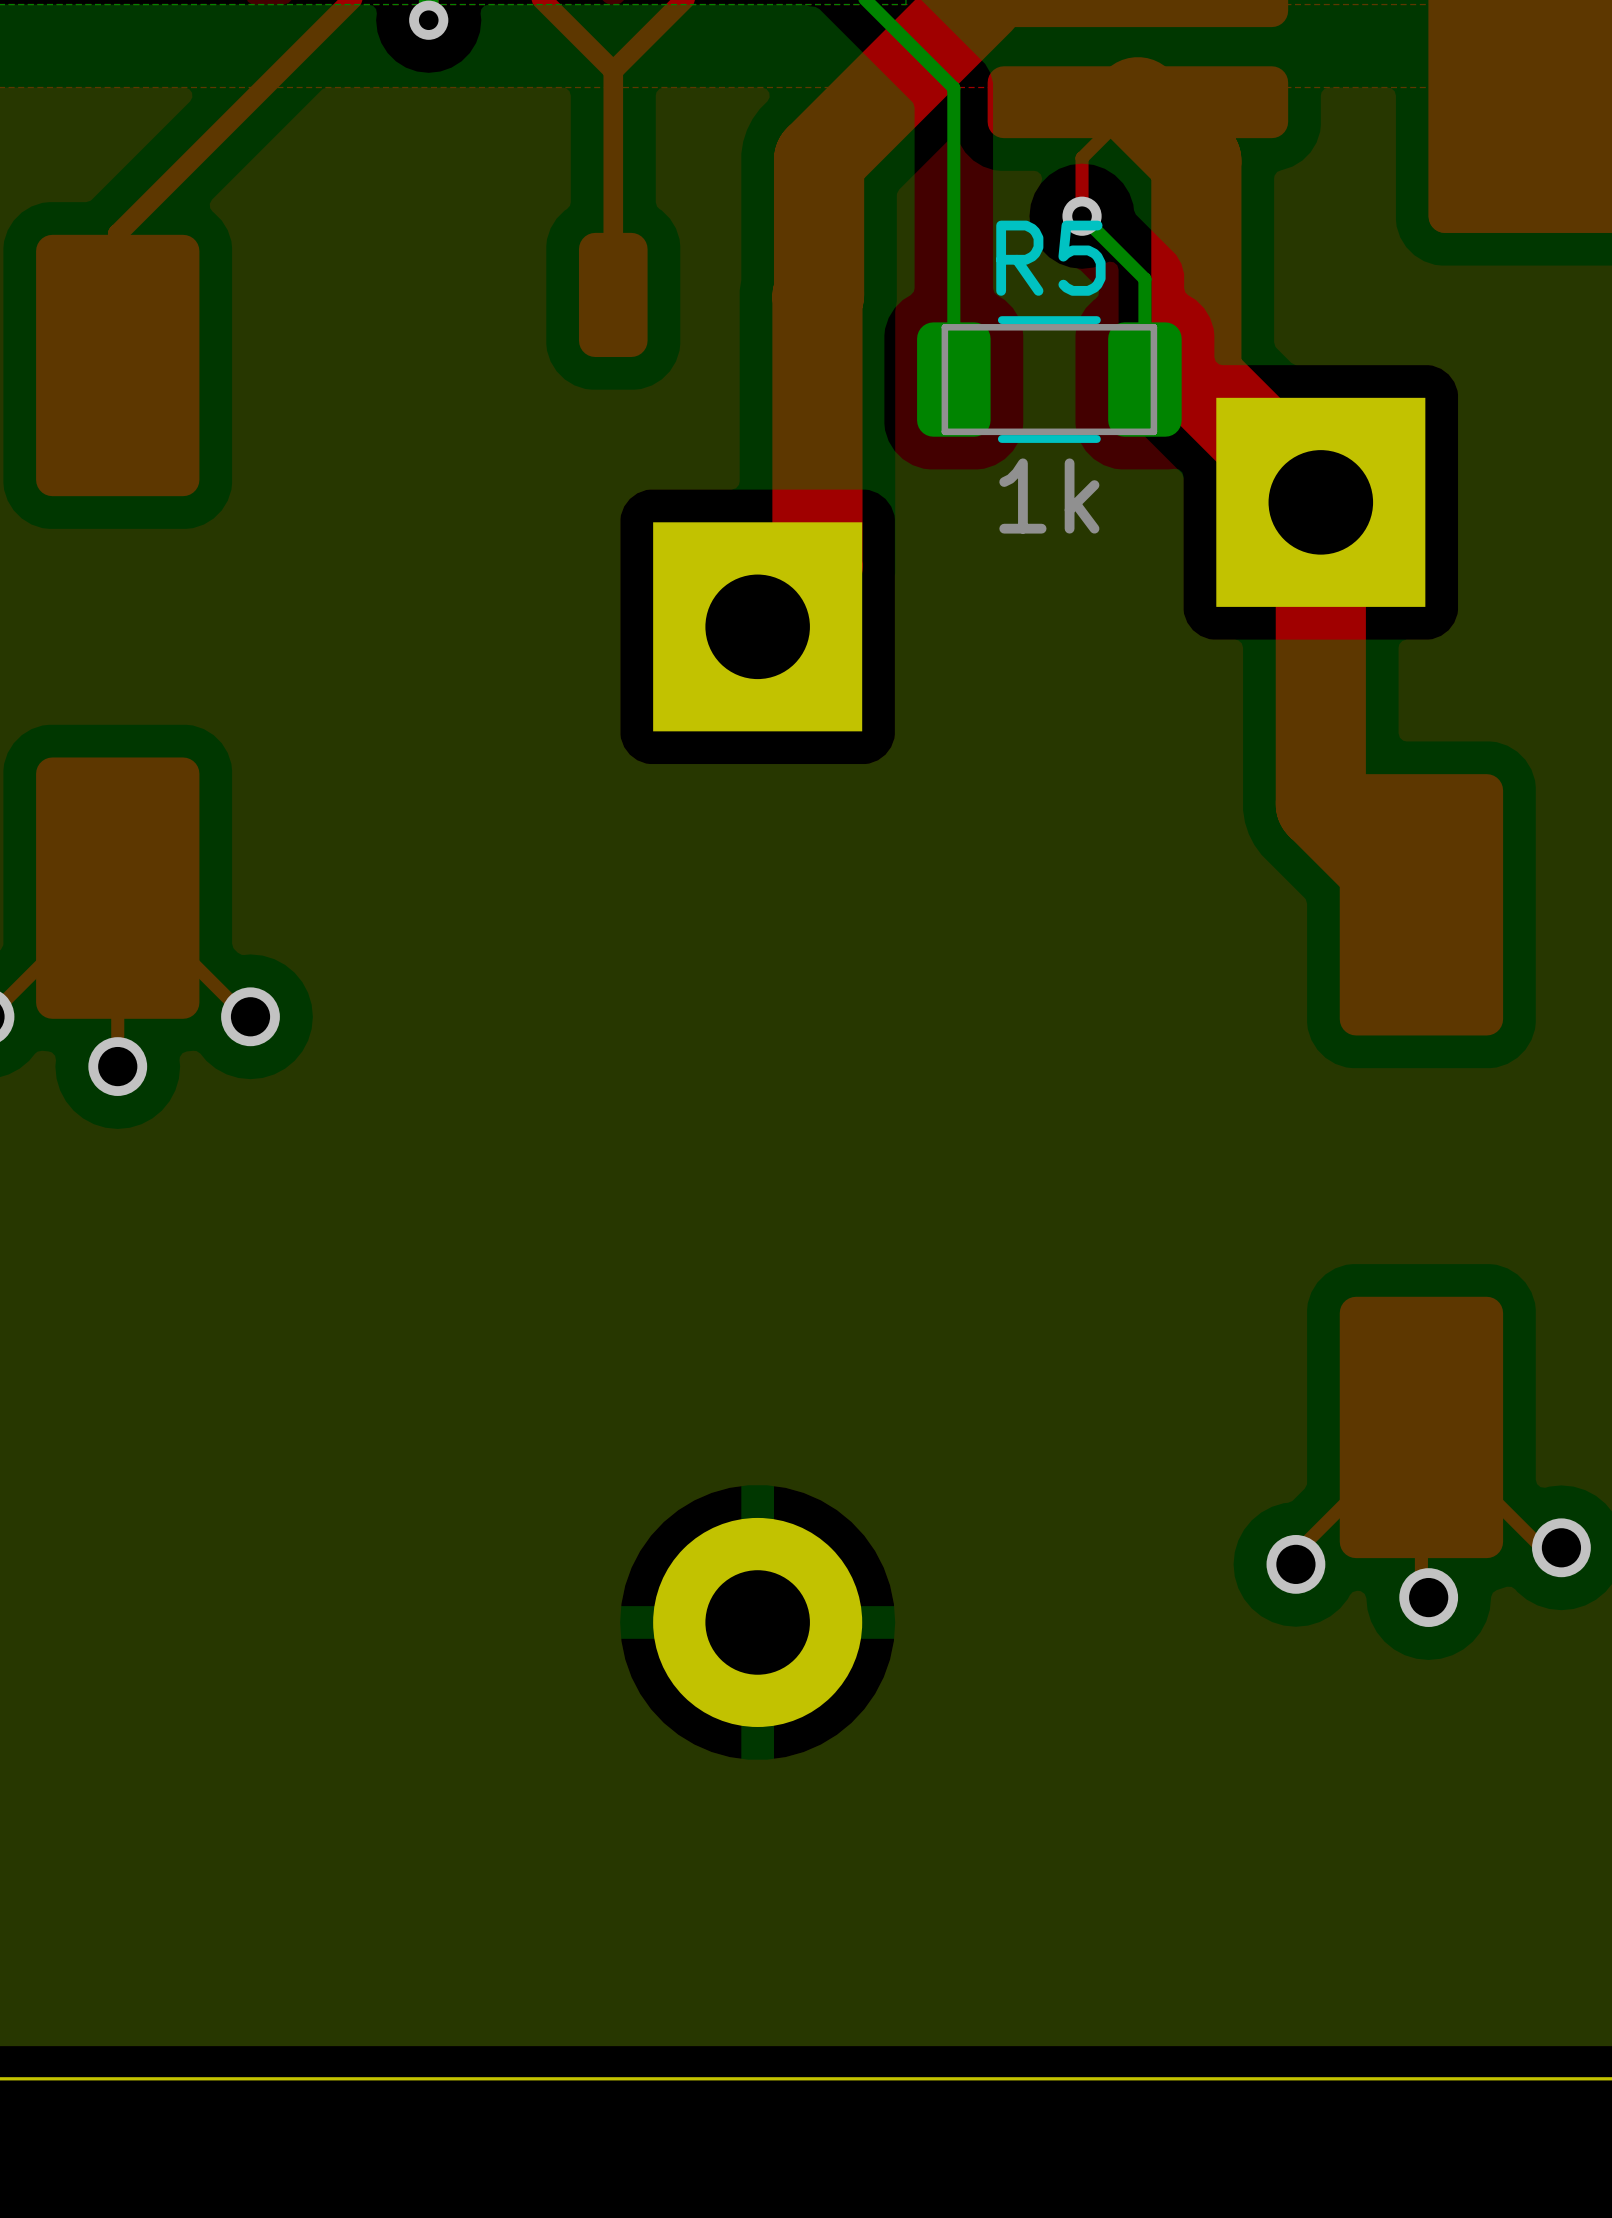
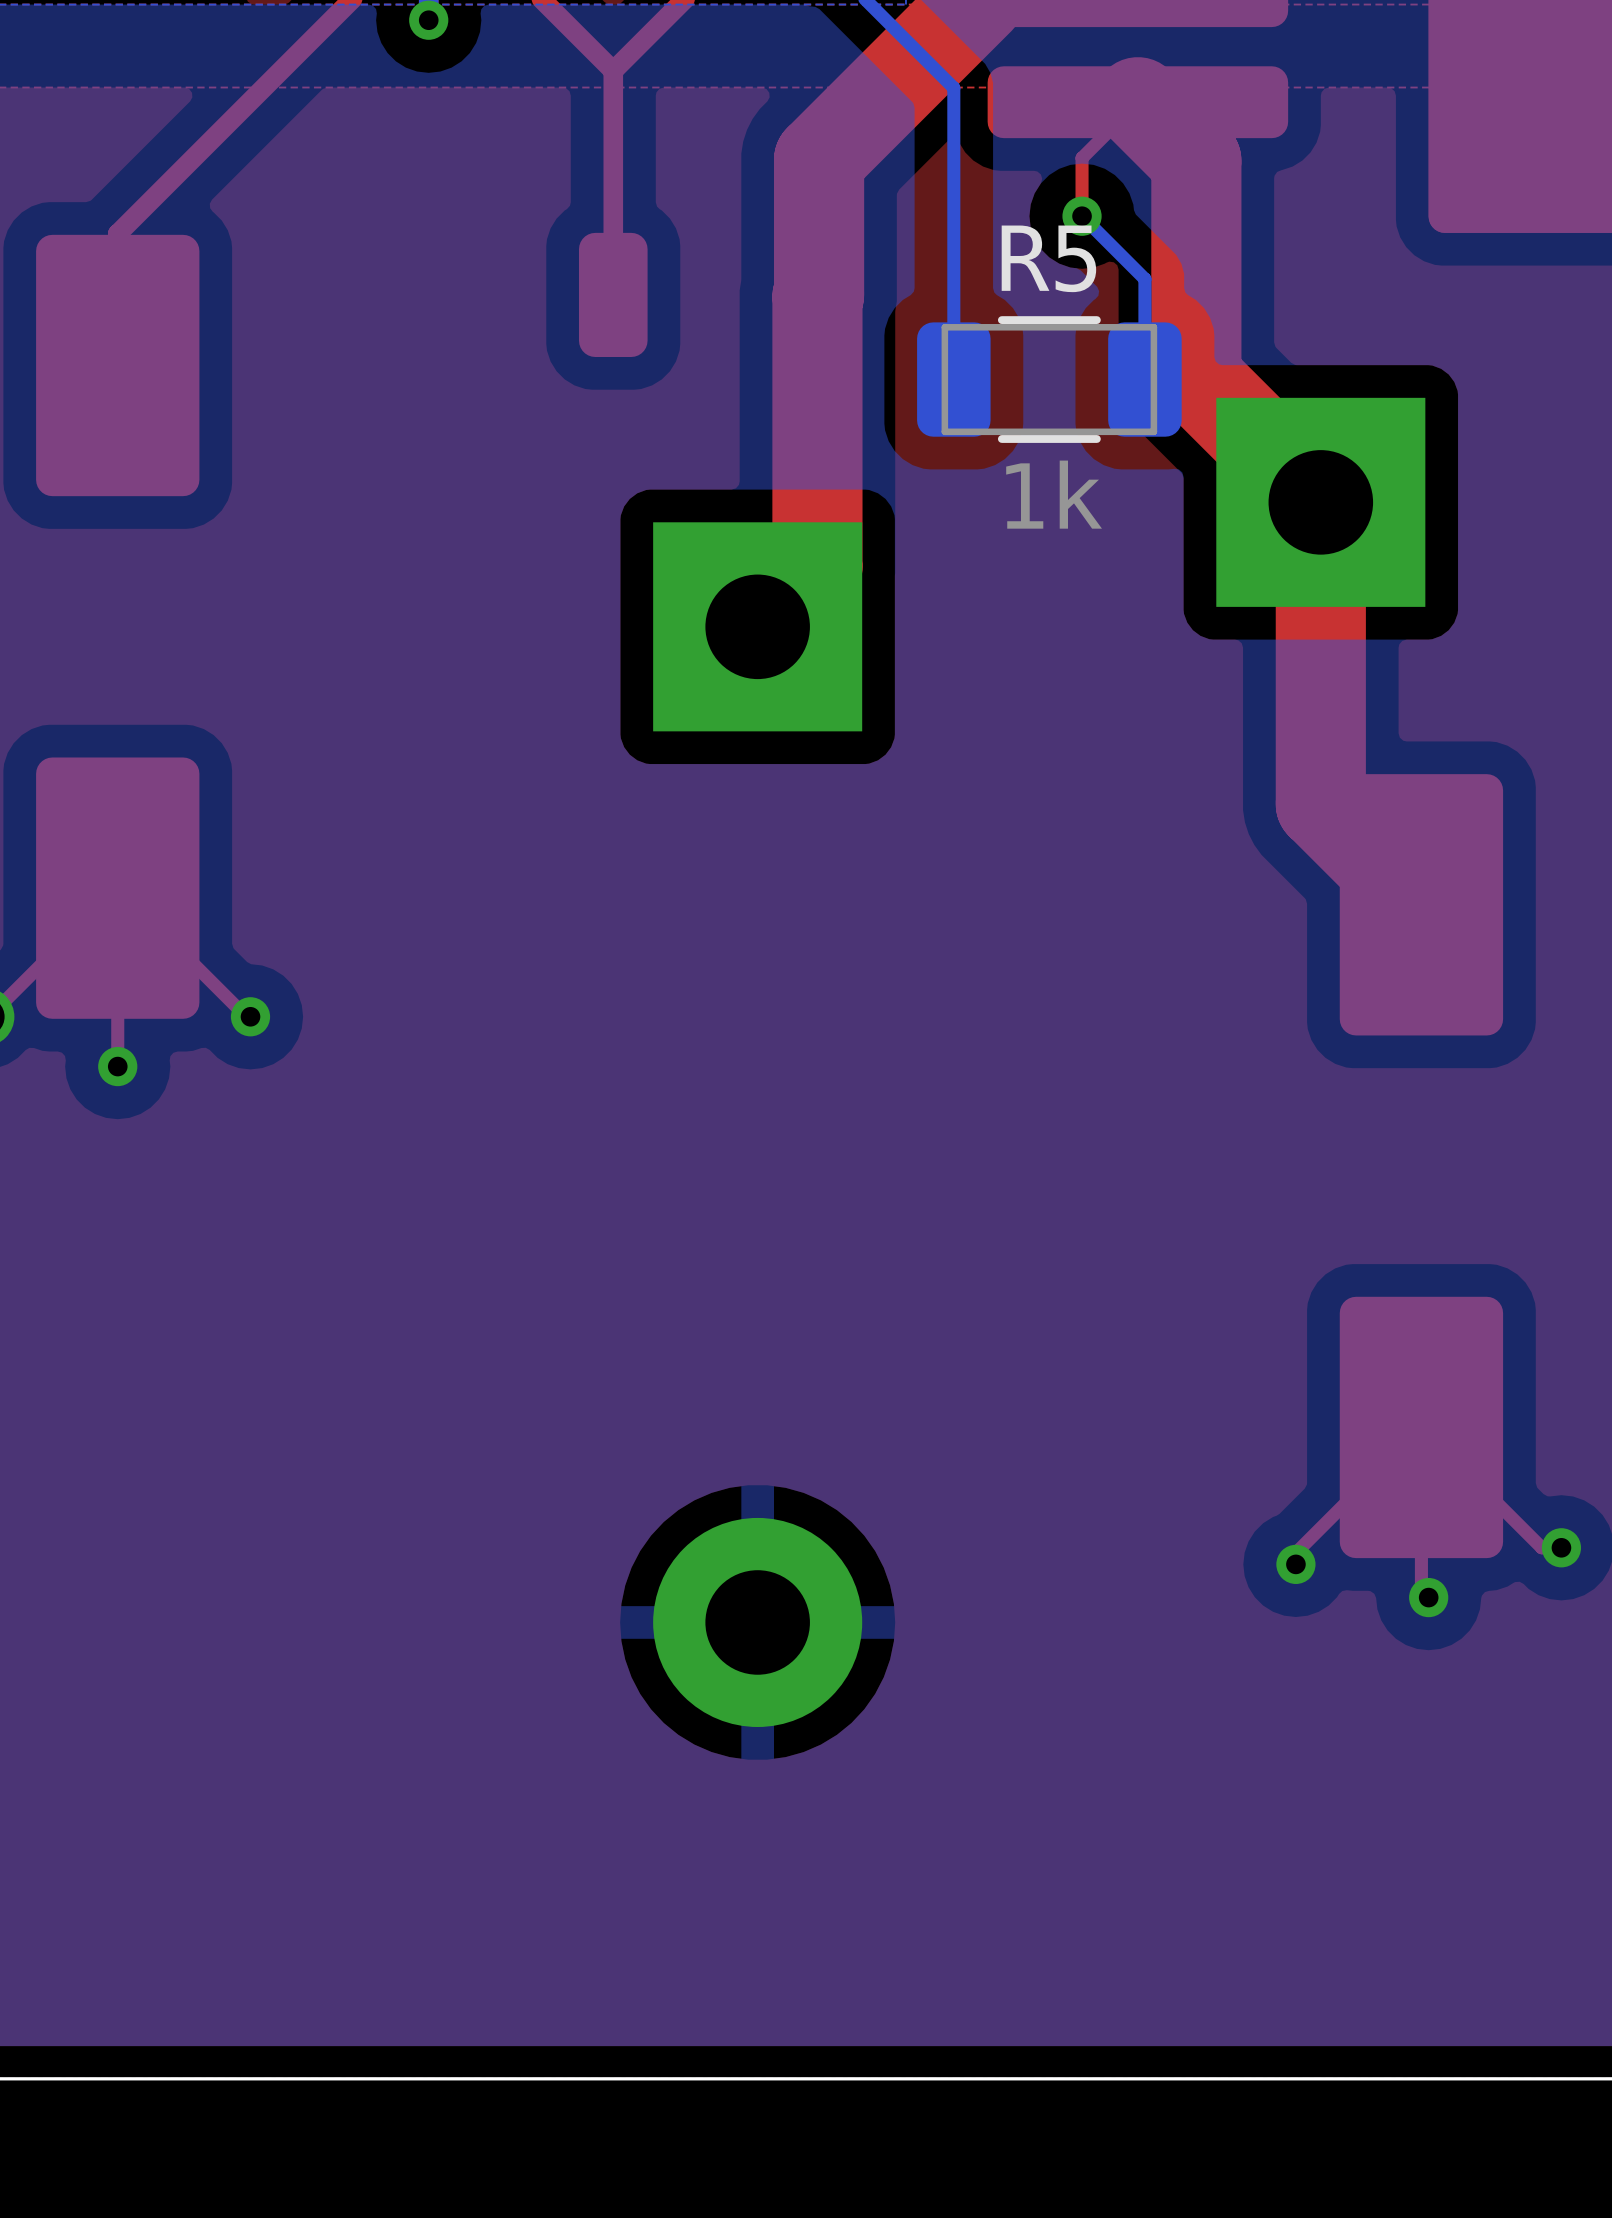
via size: [221, 987, 280, 1047] -> [230, 997, 271, 1037]
via size: [88, 1037, 148, 1096] -> [98, 1046, 138, 1087]
via size: [1532, 1518, 1591, 1578] -> [1541, 1528, 1582, 1568]
via size: [1266, 1534, 1326, 1594] -> [1276, 1544, 1316, 1584]
via size: [1399, 1568, 1459, 1627] -> [1409, 1577, 1449, 1618]

